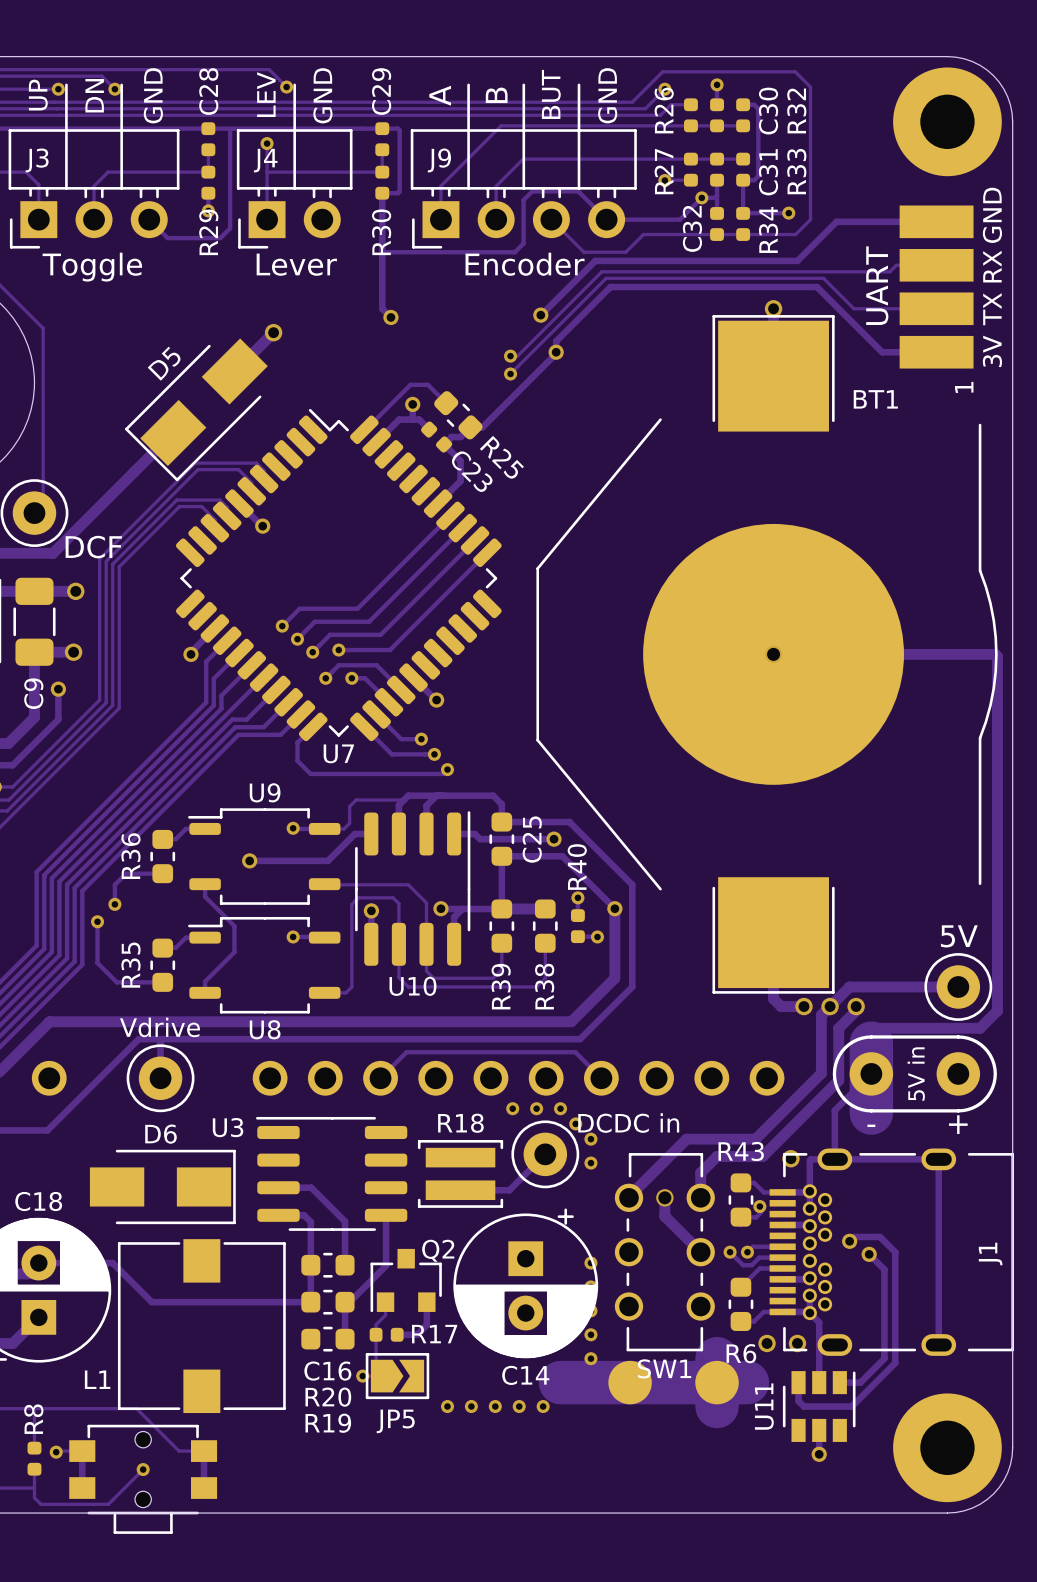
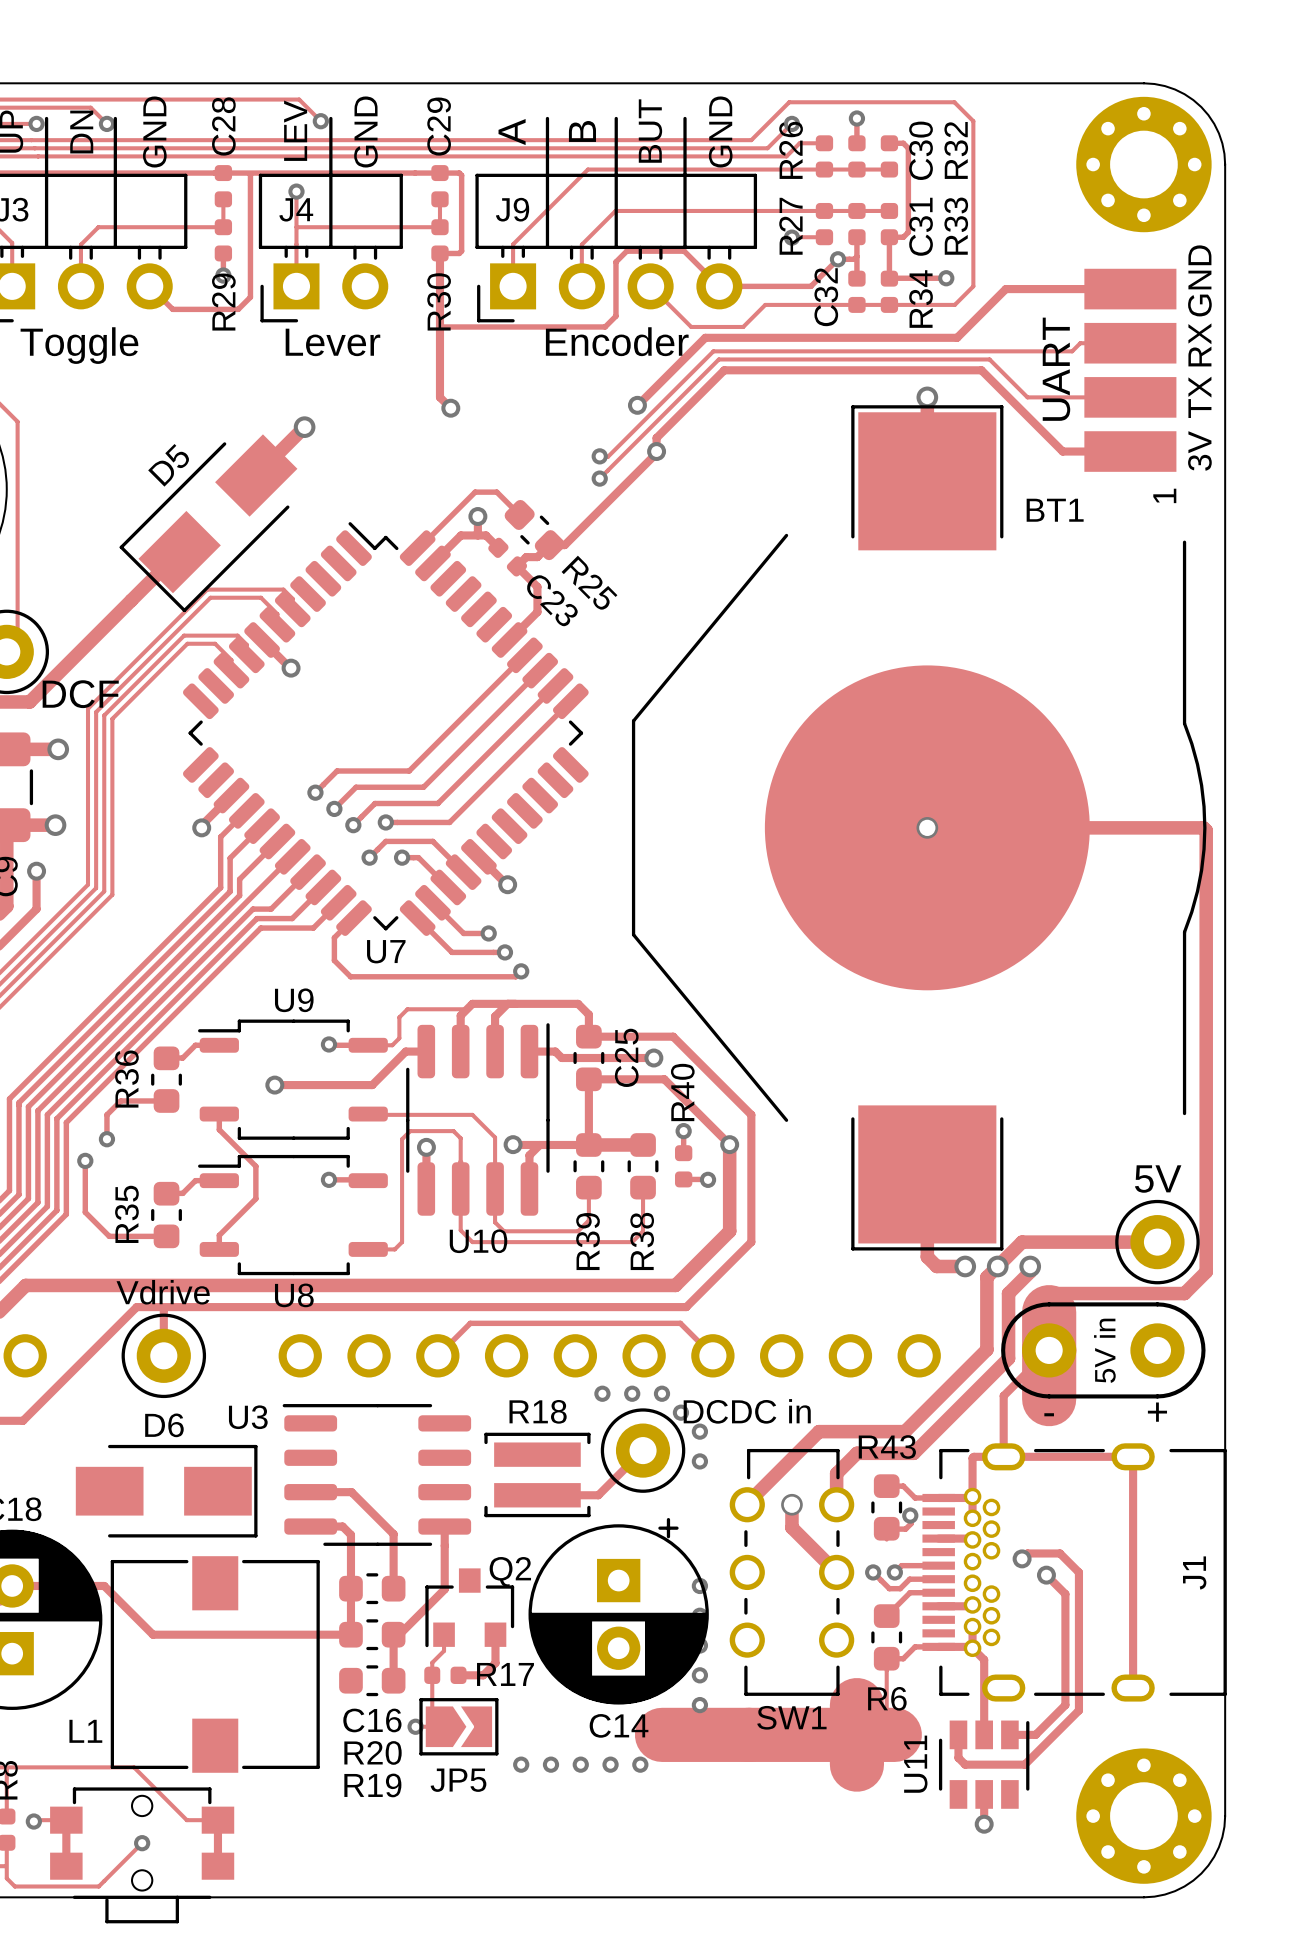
part footprint: [893, 67, 1002, 177] -> [1076, 96, 1212, 233]
via: (790, 1158) -> none
track: none -> (886, 1658) (886, 1734)
via: (767, 1343) -> none
via: (797, 1343) -> none
part footprint: [893, 1393, 1002, 1503] -> [1076, 1748, 1212, 1884]

